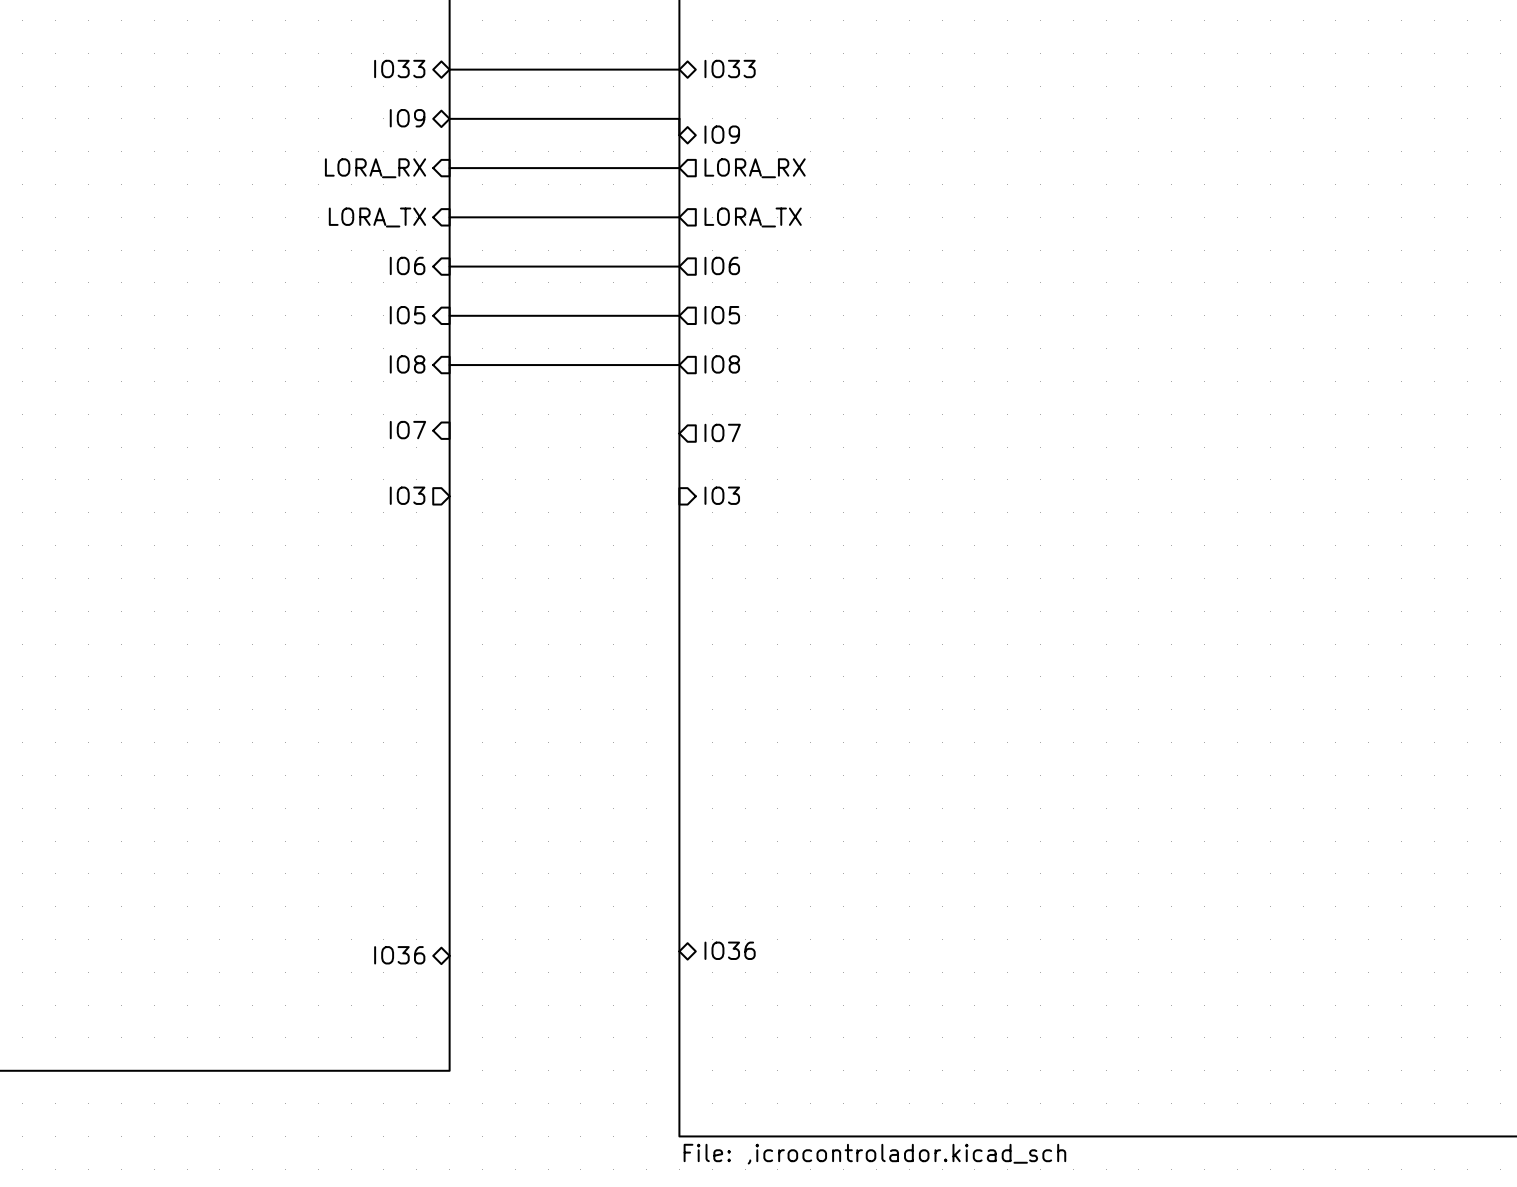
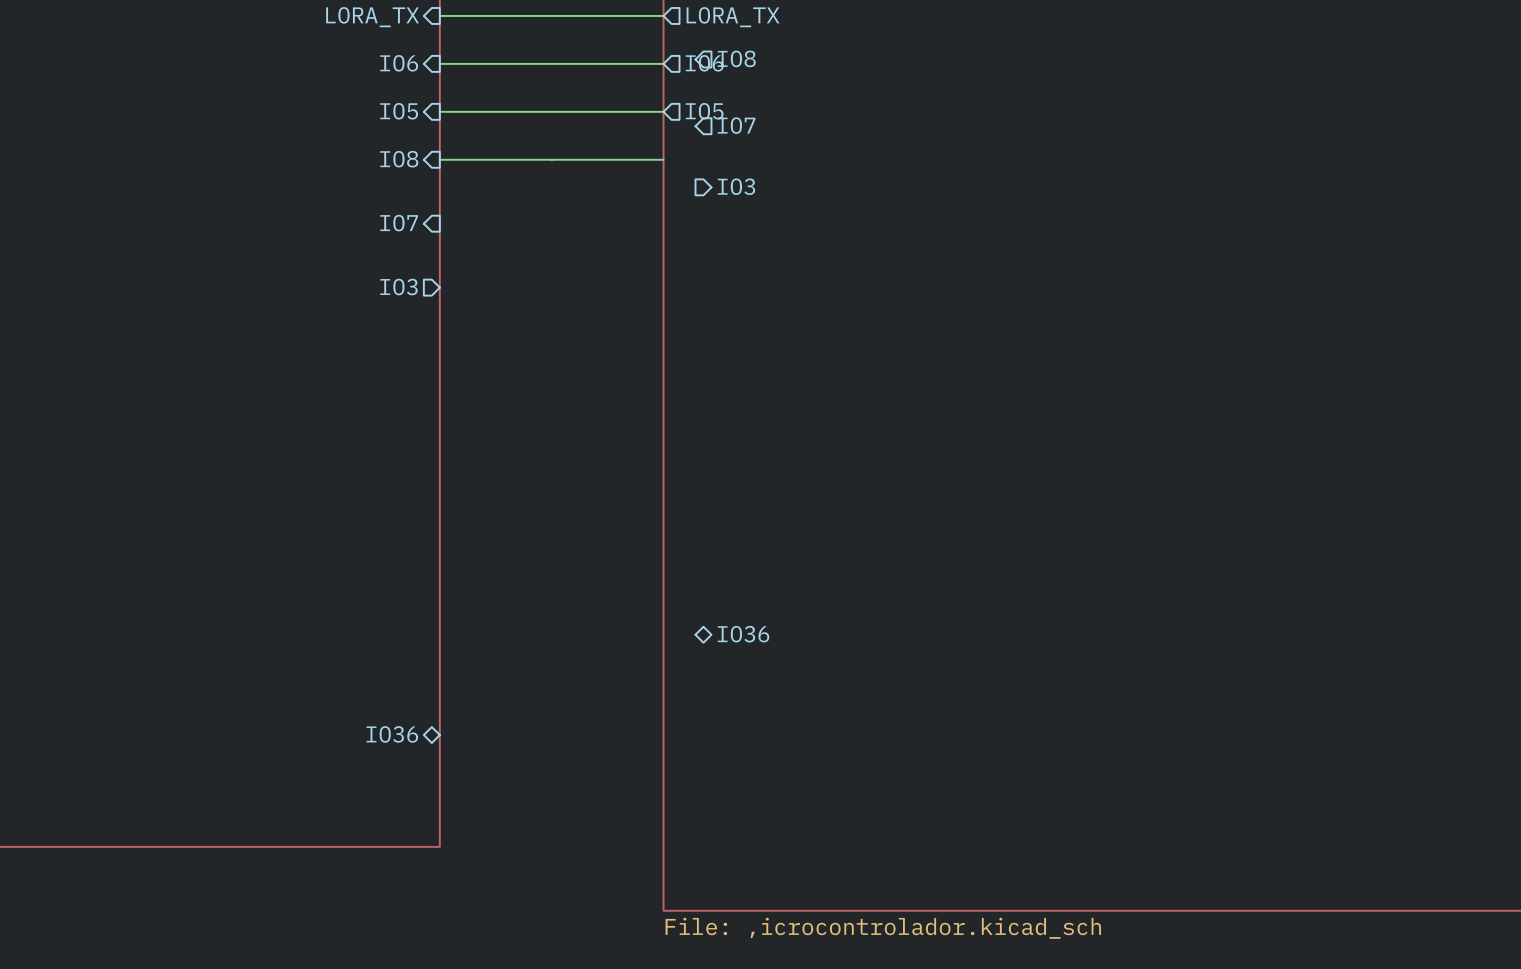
sheet pin position: IO8 (722, 364) -> IO8 (736, 58)
sheet pin position: IO7 (722, 432) -> IO7 (736, 125)
sheet pin position: IO3 (722, 495) -> IO3 (736, 186)
sheet pin position: IO36 (730, 950) -> IO36 (743, 634)

